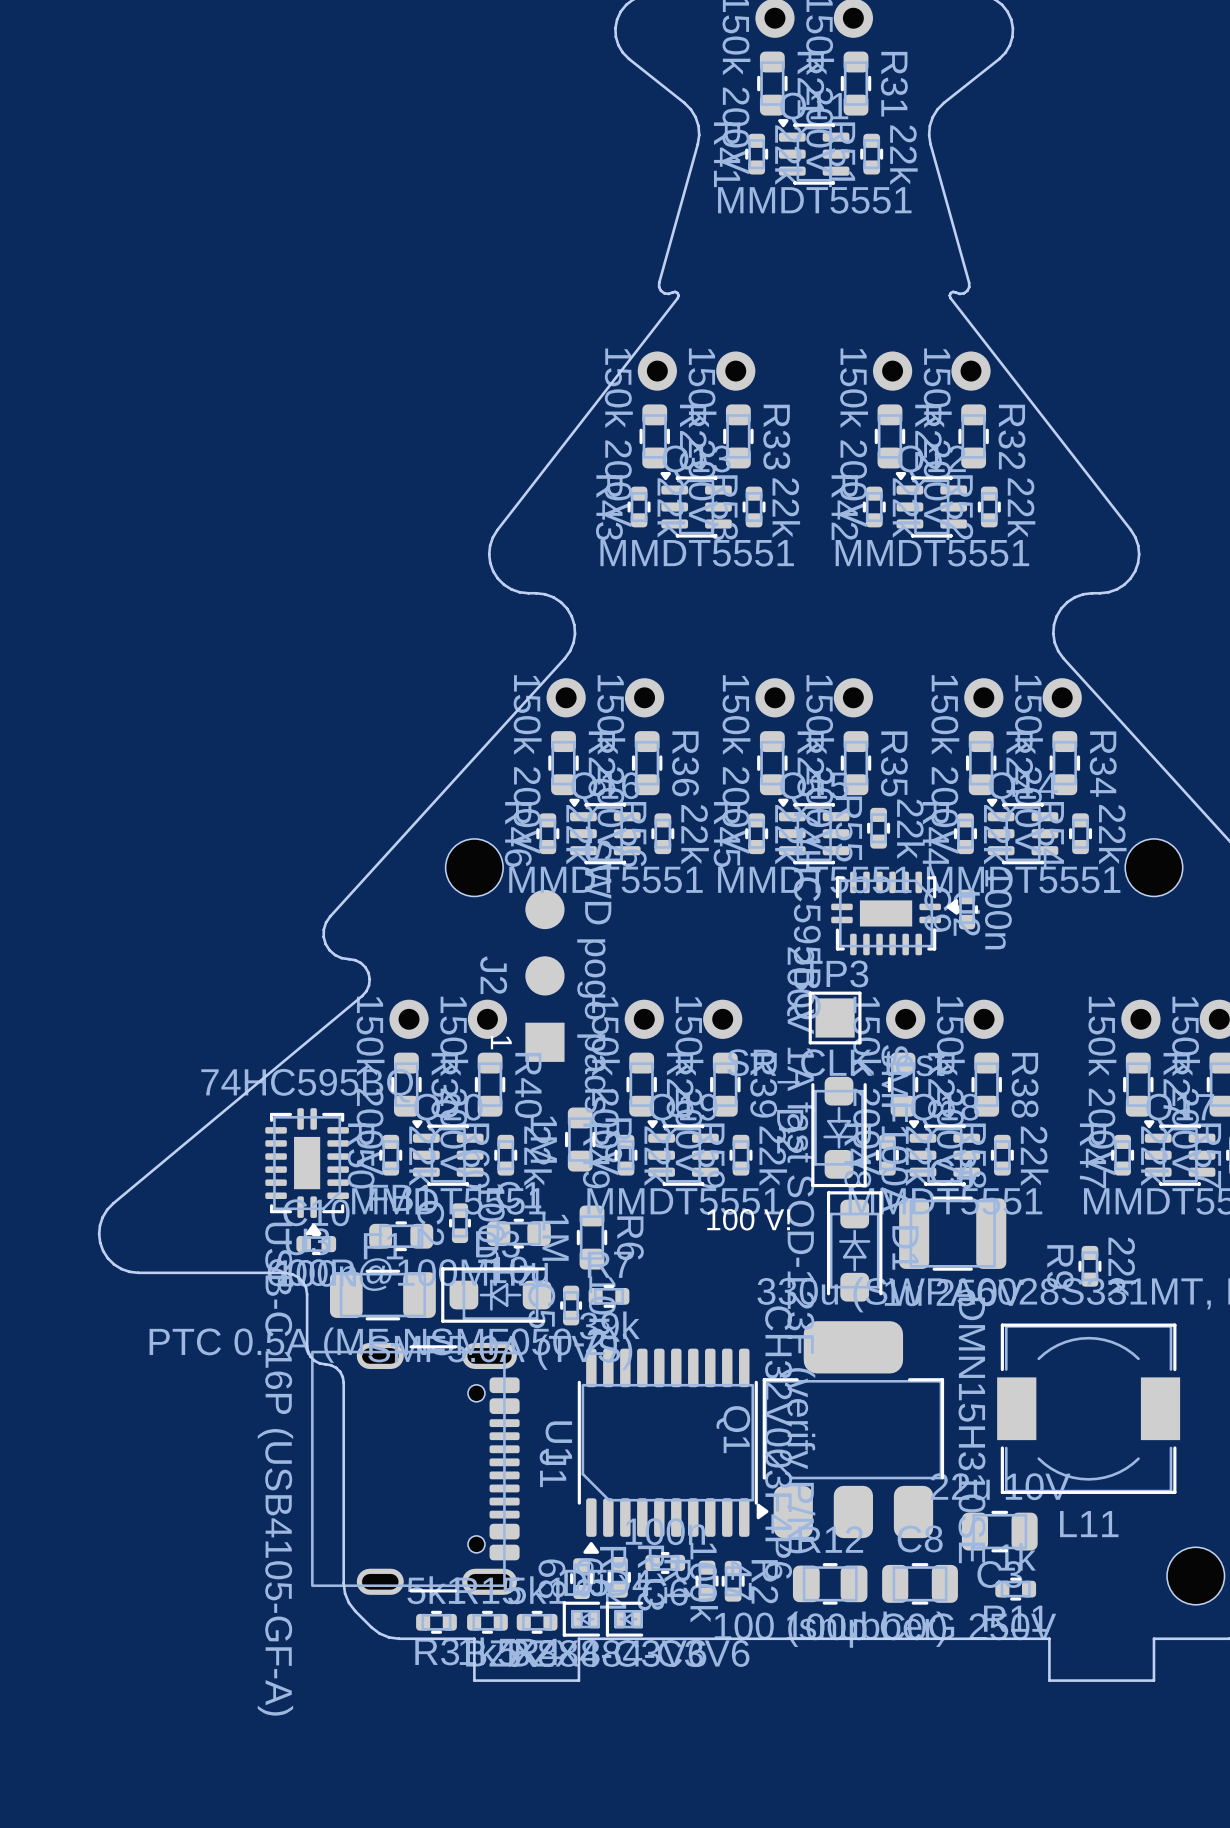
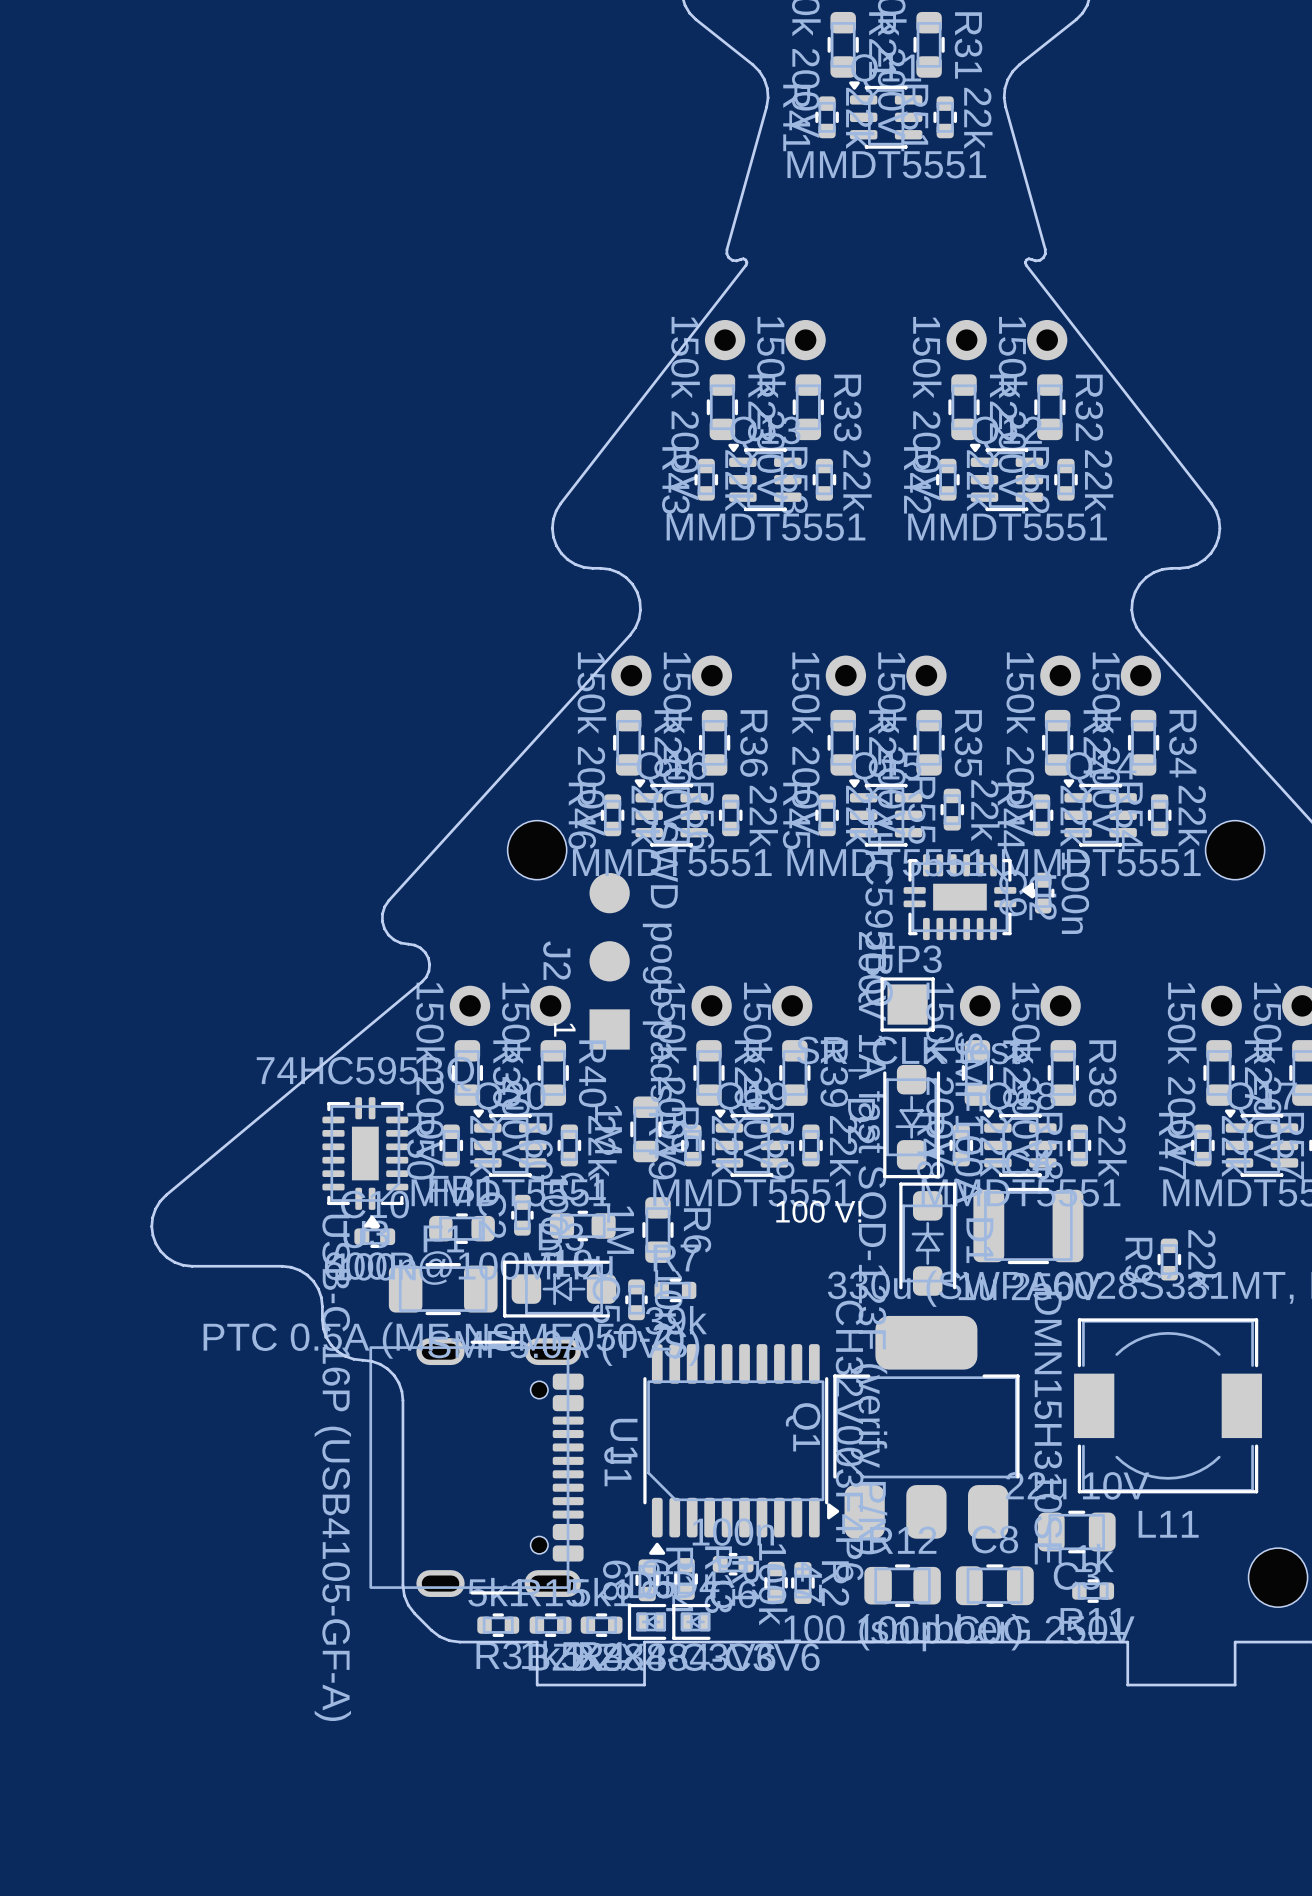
board edge: (226, 1272) (284, 1272) (292, 1274) (303, 1282) (307, 1294) (308, 1351) (314, 1360) (331, 1365) (340, 1371) (343, 1382) (343, 1403) -> (282, 1266) (299, 1270) (313, 1281) (318, 1289) (321, 1297) (323, 1328) (331, 1345) (345, 1356) (371, 1361) (387, 1368) (398, 1383) (402, 1400)

